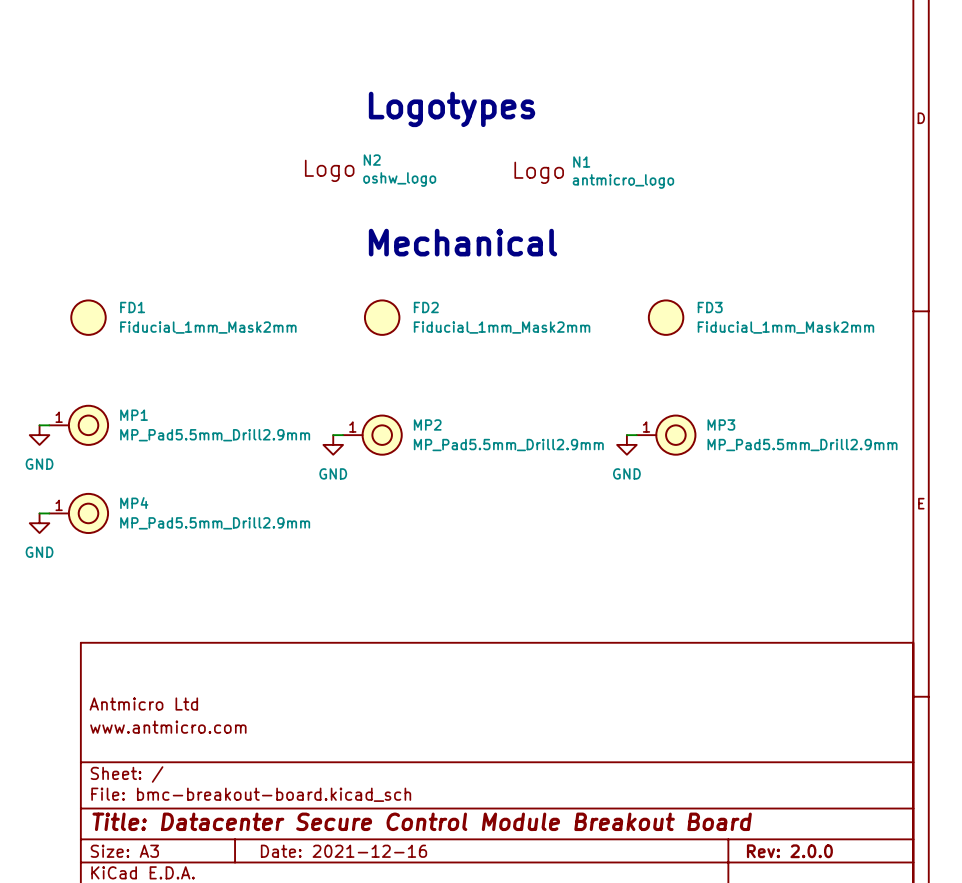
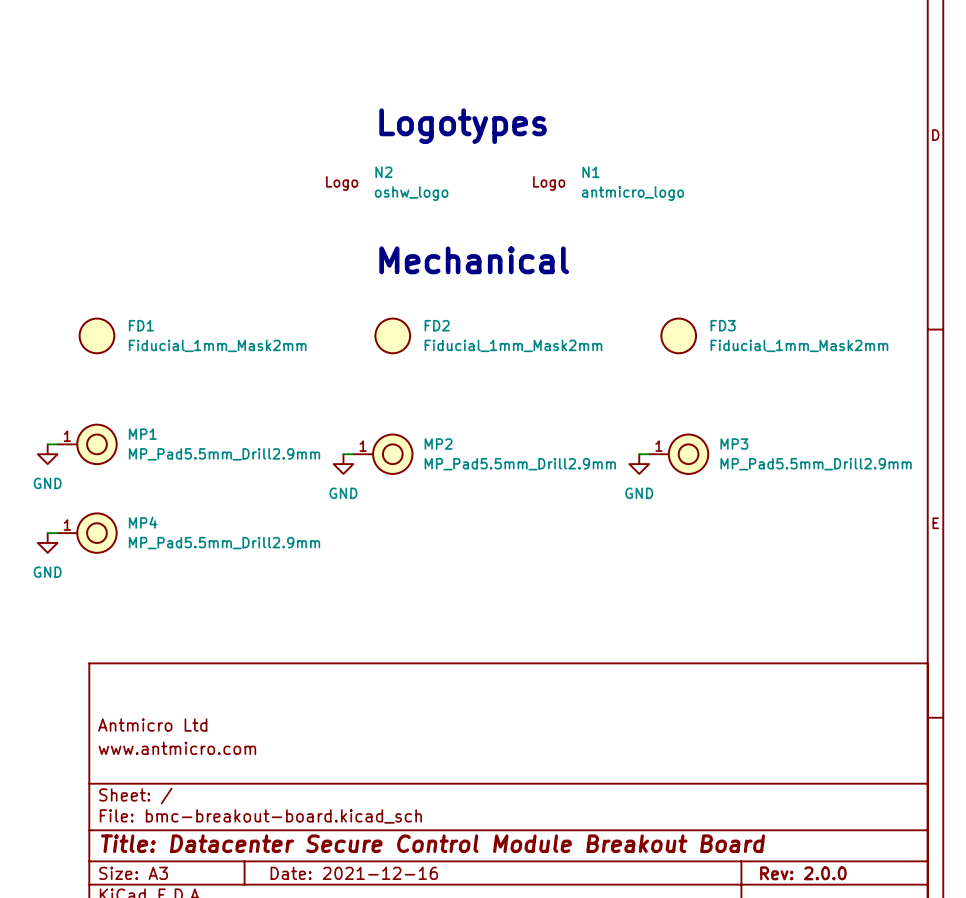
N2 symbol: [305, 154, 436, 187] -> [326, 166, 449, 201]
N1 symbol: [514, 156, 674, 189] -> [533, 166, 684, 201]

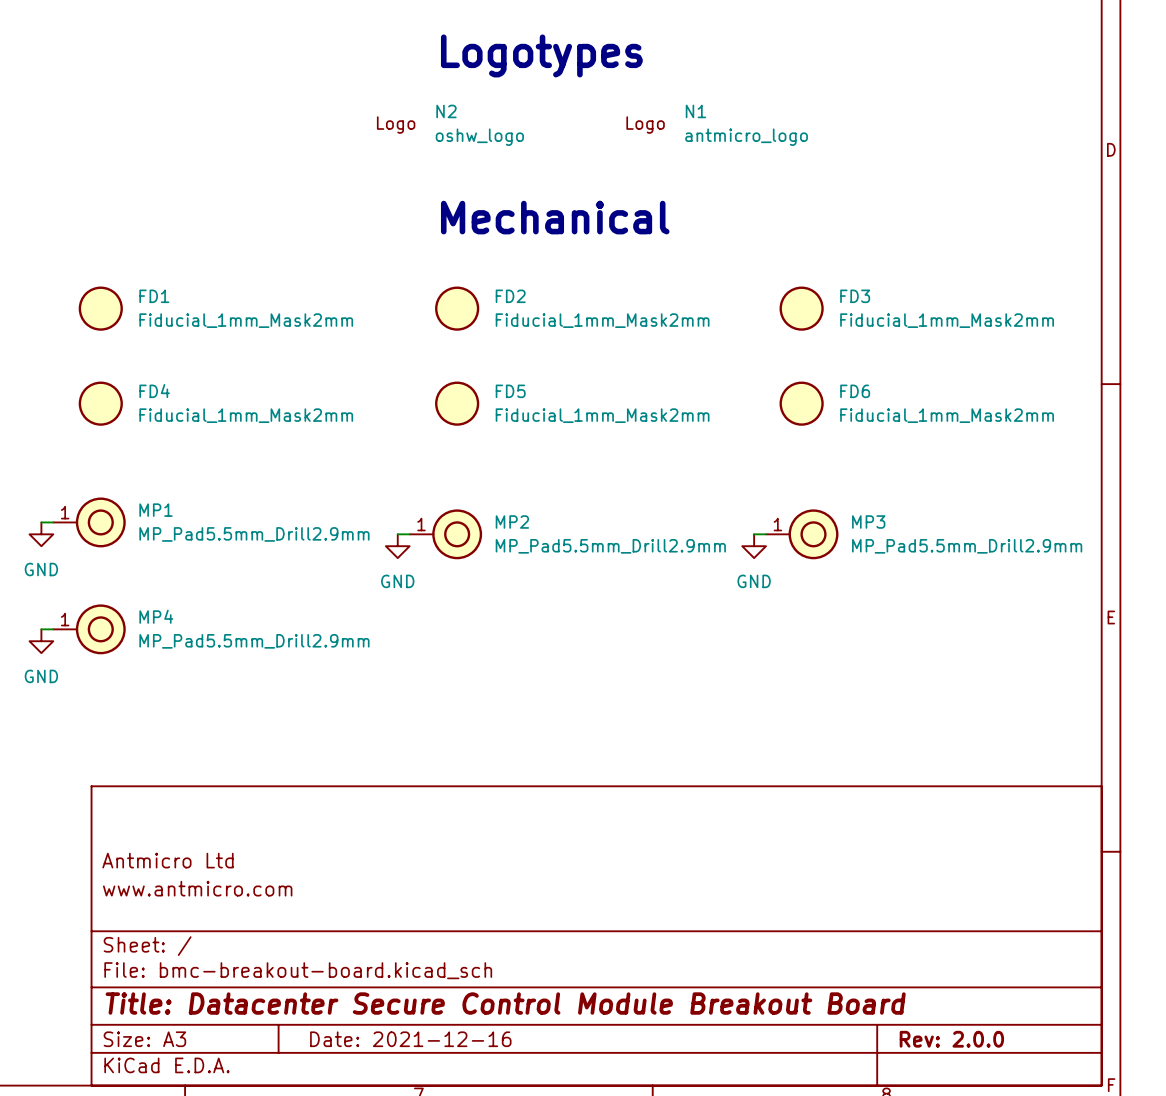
text position: Logotypes (463, 126) -> Logotypes (541, 55)
N2 position: (387, 183) -> (450, 125)
N1 position: (608, 183) -> (717, 125)
text position: Mechanical (474, 260) -> Mechanical (555, 217)
FD1 position: (96, 335) -> (100, 308)
FD2 position: (392, 335) -> (457, 308)
FD3 position: (678, 335) -> (801, 308)
FD4: none -> Fiducial_1mm_Mask2mm (100, 403)
FD5: none -> Fiducial_1mm_Mask2mm (457, 403)
FD6: none -> Fiducial_1mm_Mask2mm (801, 403)

